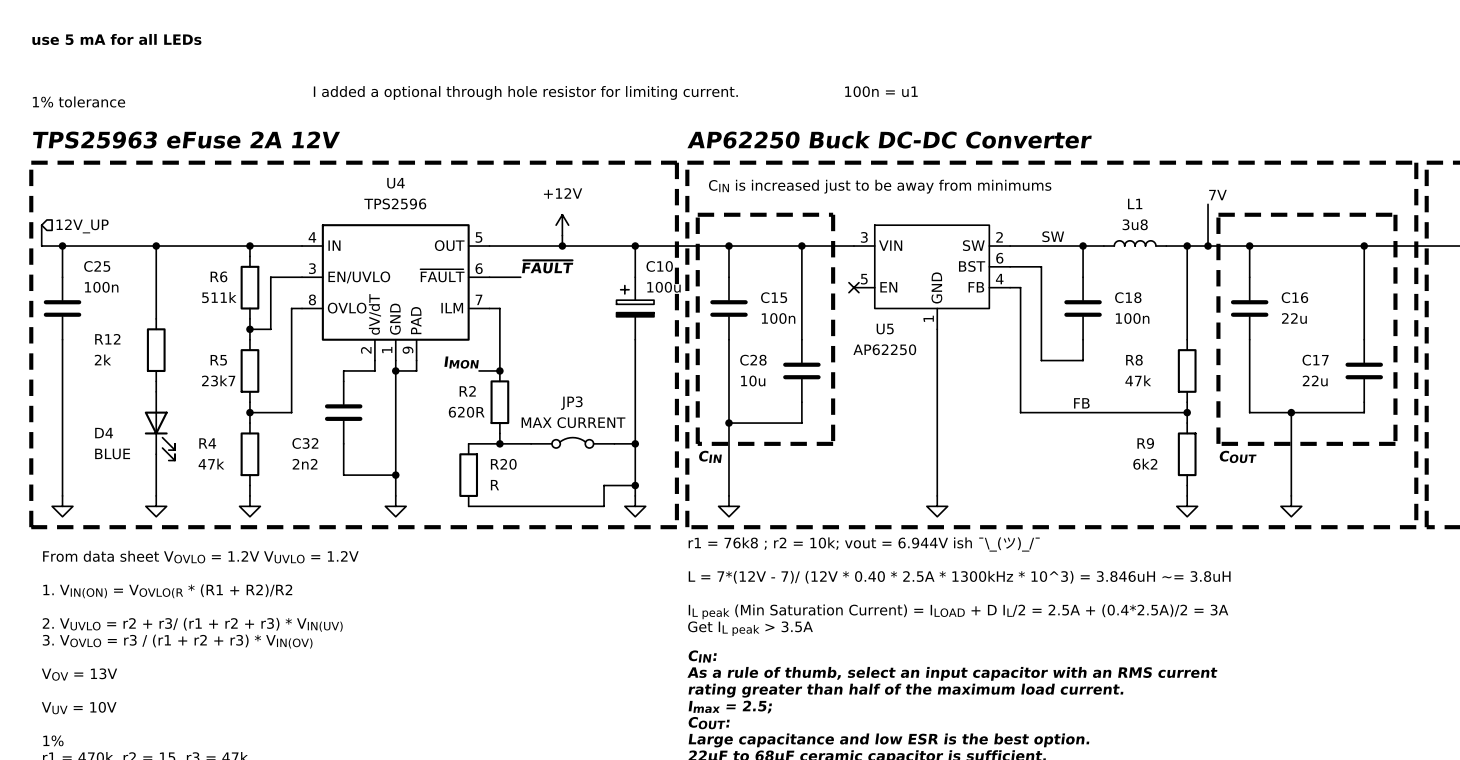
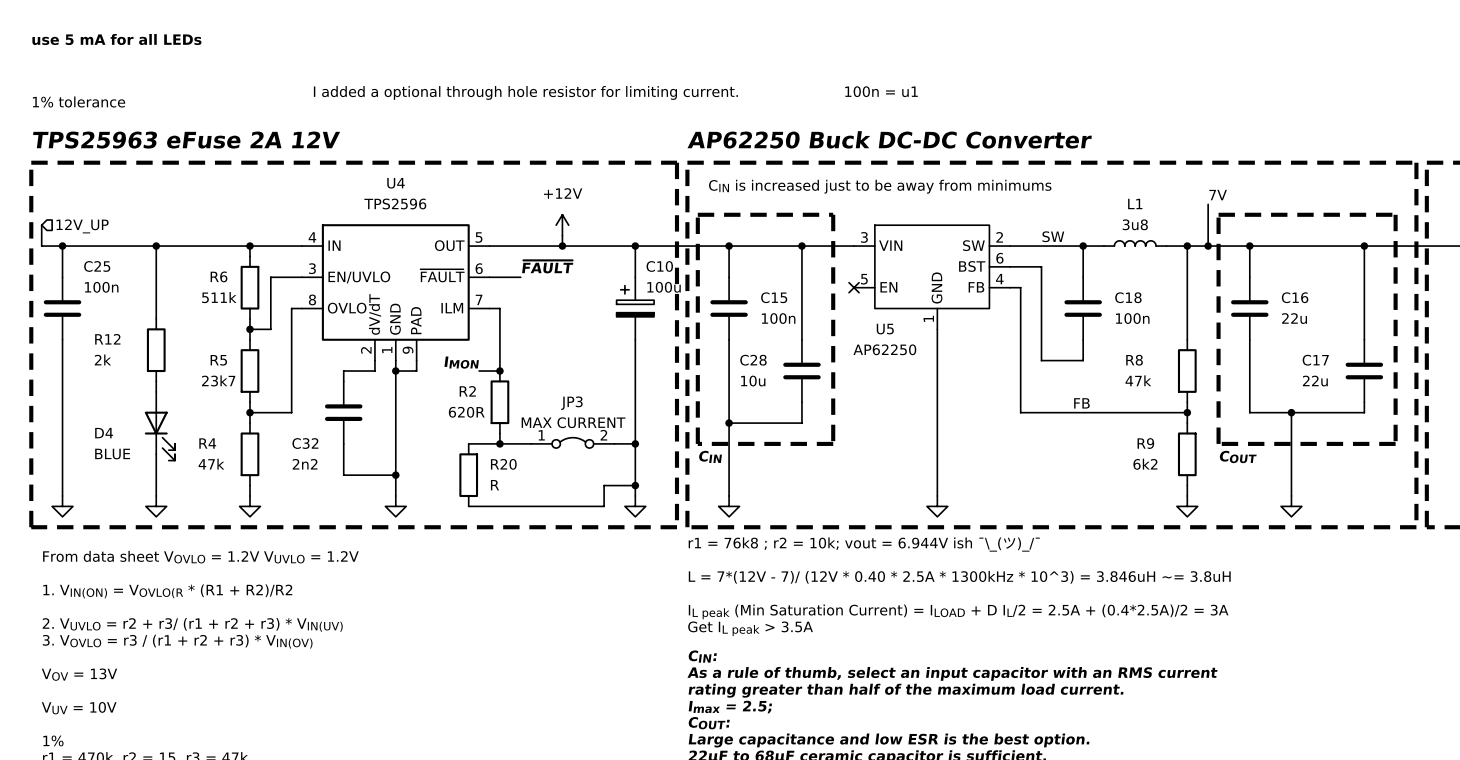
JP3 pin number: none -> 1 (541, 435)
JP3 pin number: none -> 2 (603, 435)

